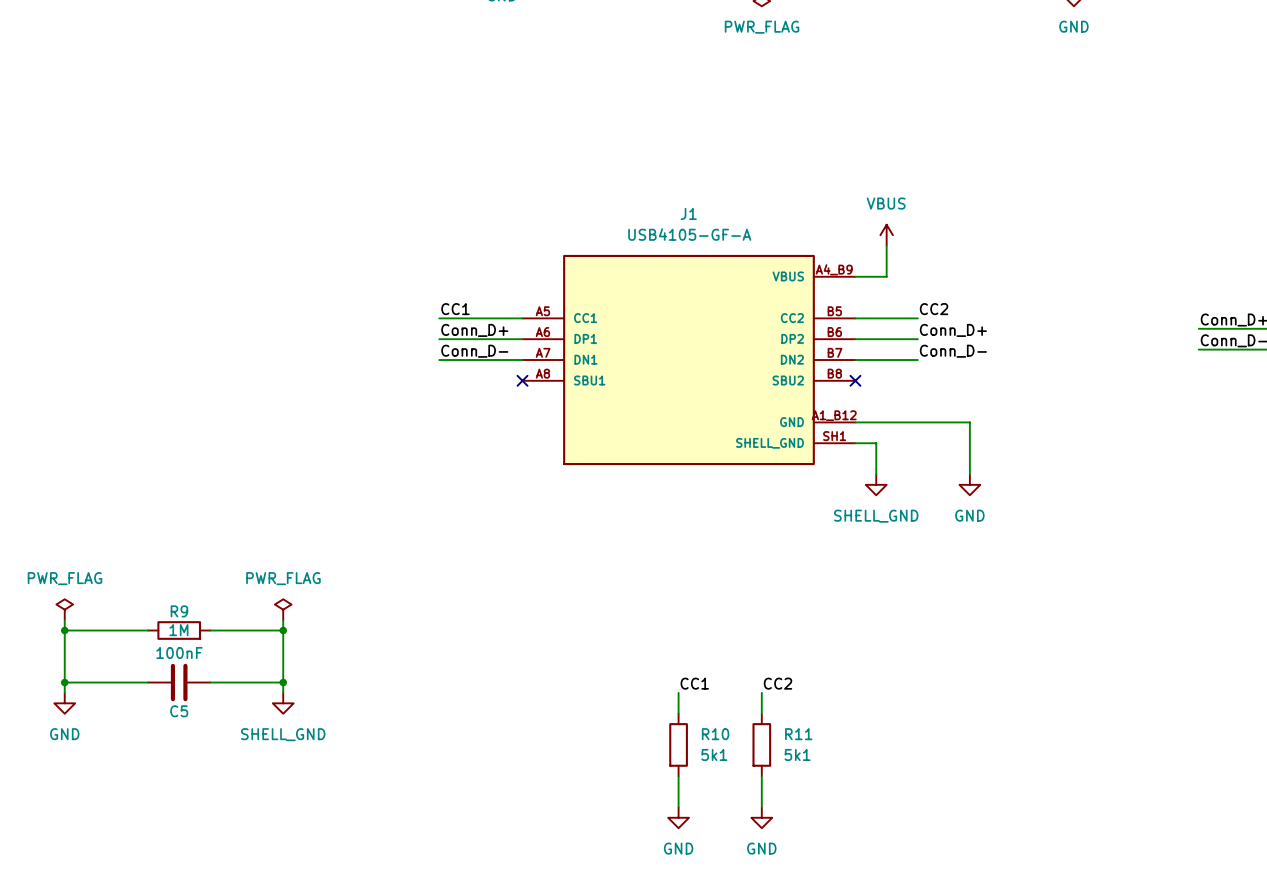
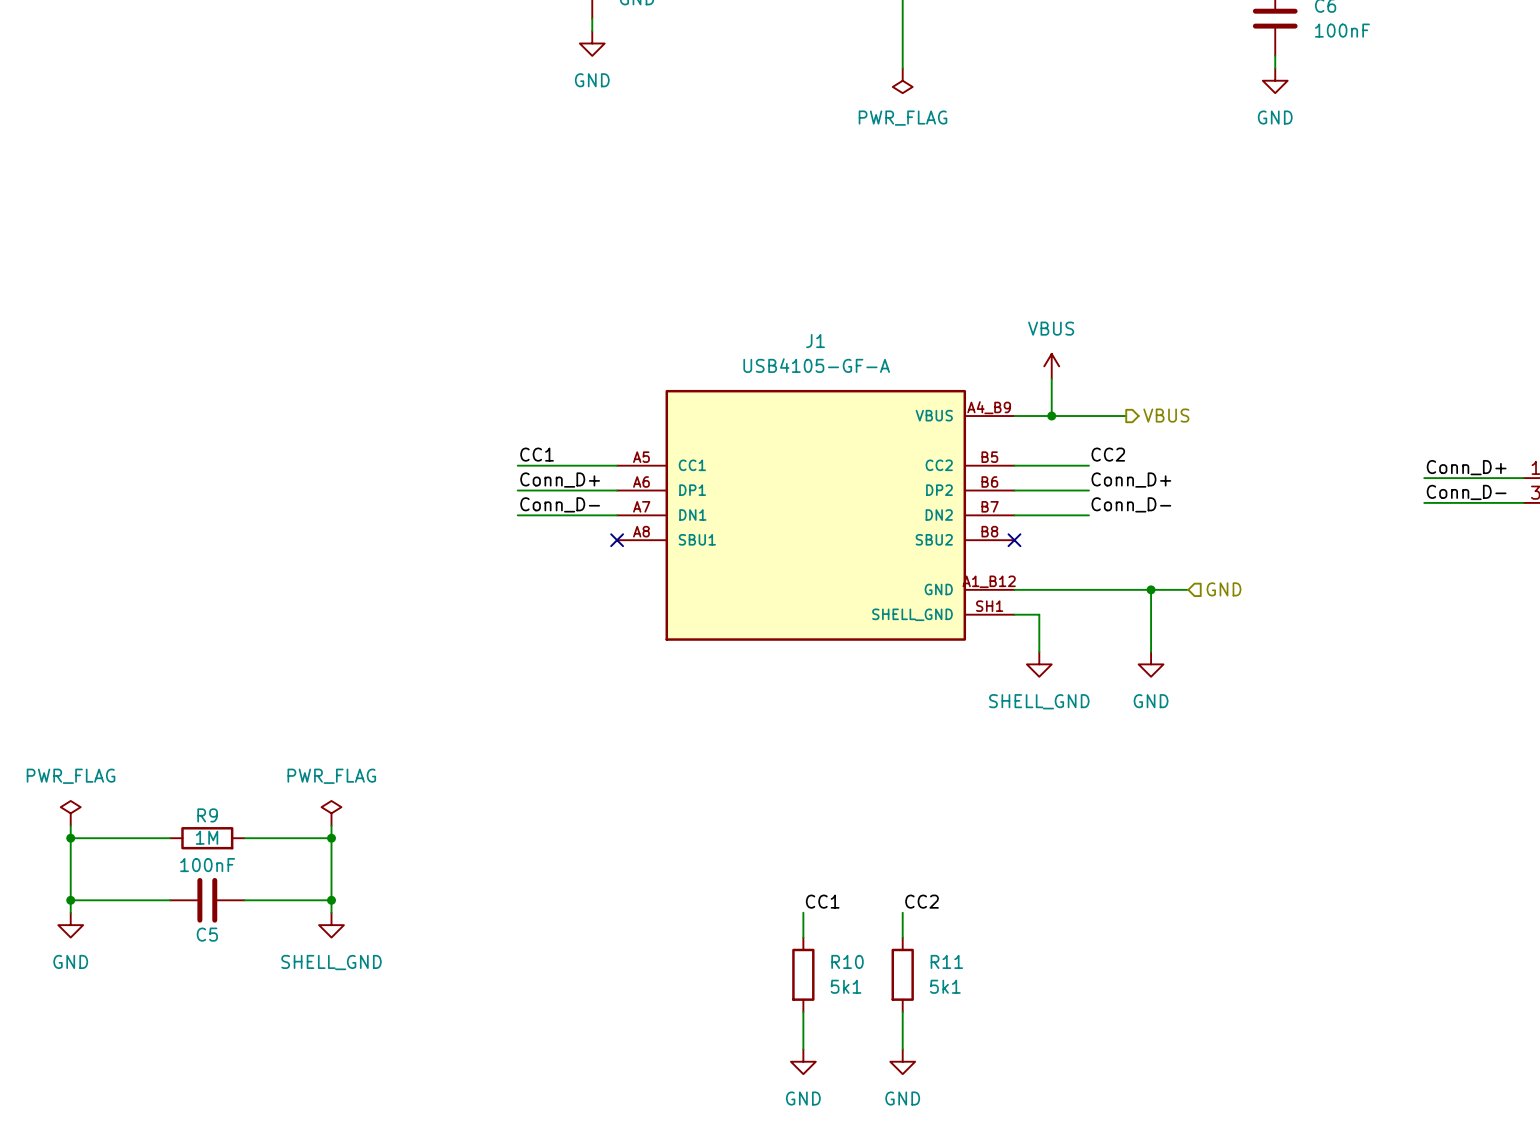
wire: none -> (1051, 416) (1126, 416)
junction: none -> (1051, 416)
hierarchical label: none -> VBUS (1166, 415)
wire: none -> (1151, 589) (1188, 589)
junction: none -> (1151, 589)
hierarchical label: none -> GND (1223, 589)

